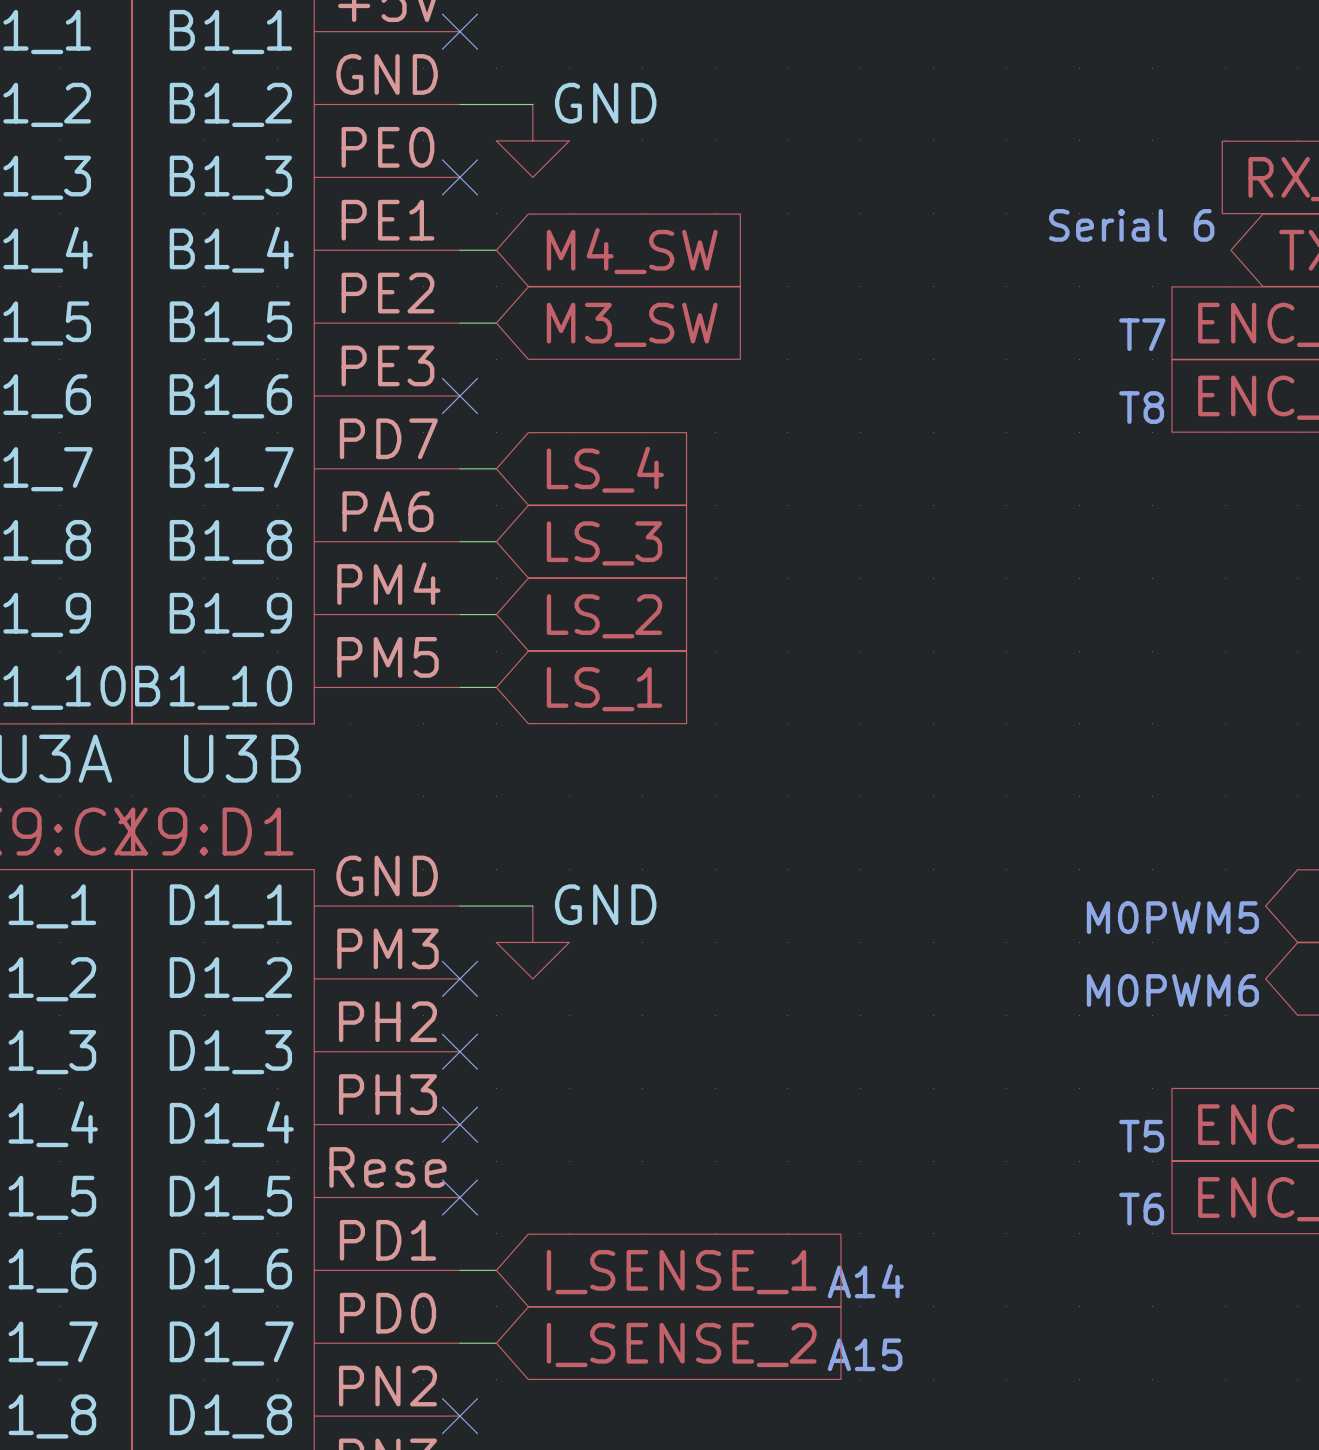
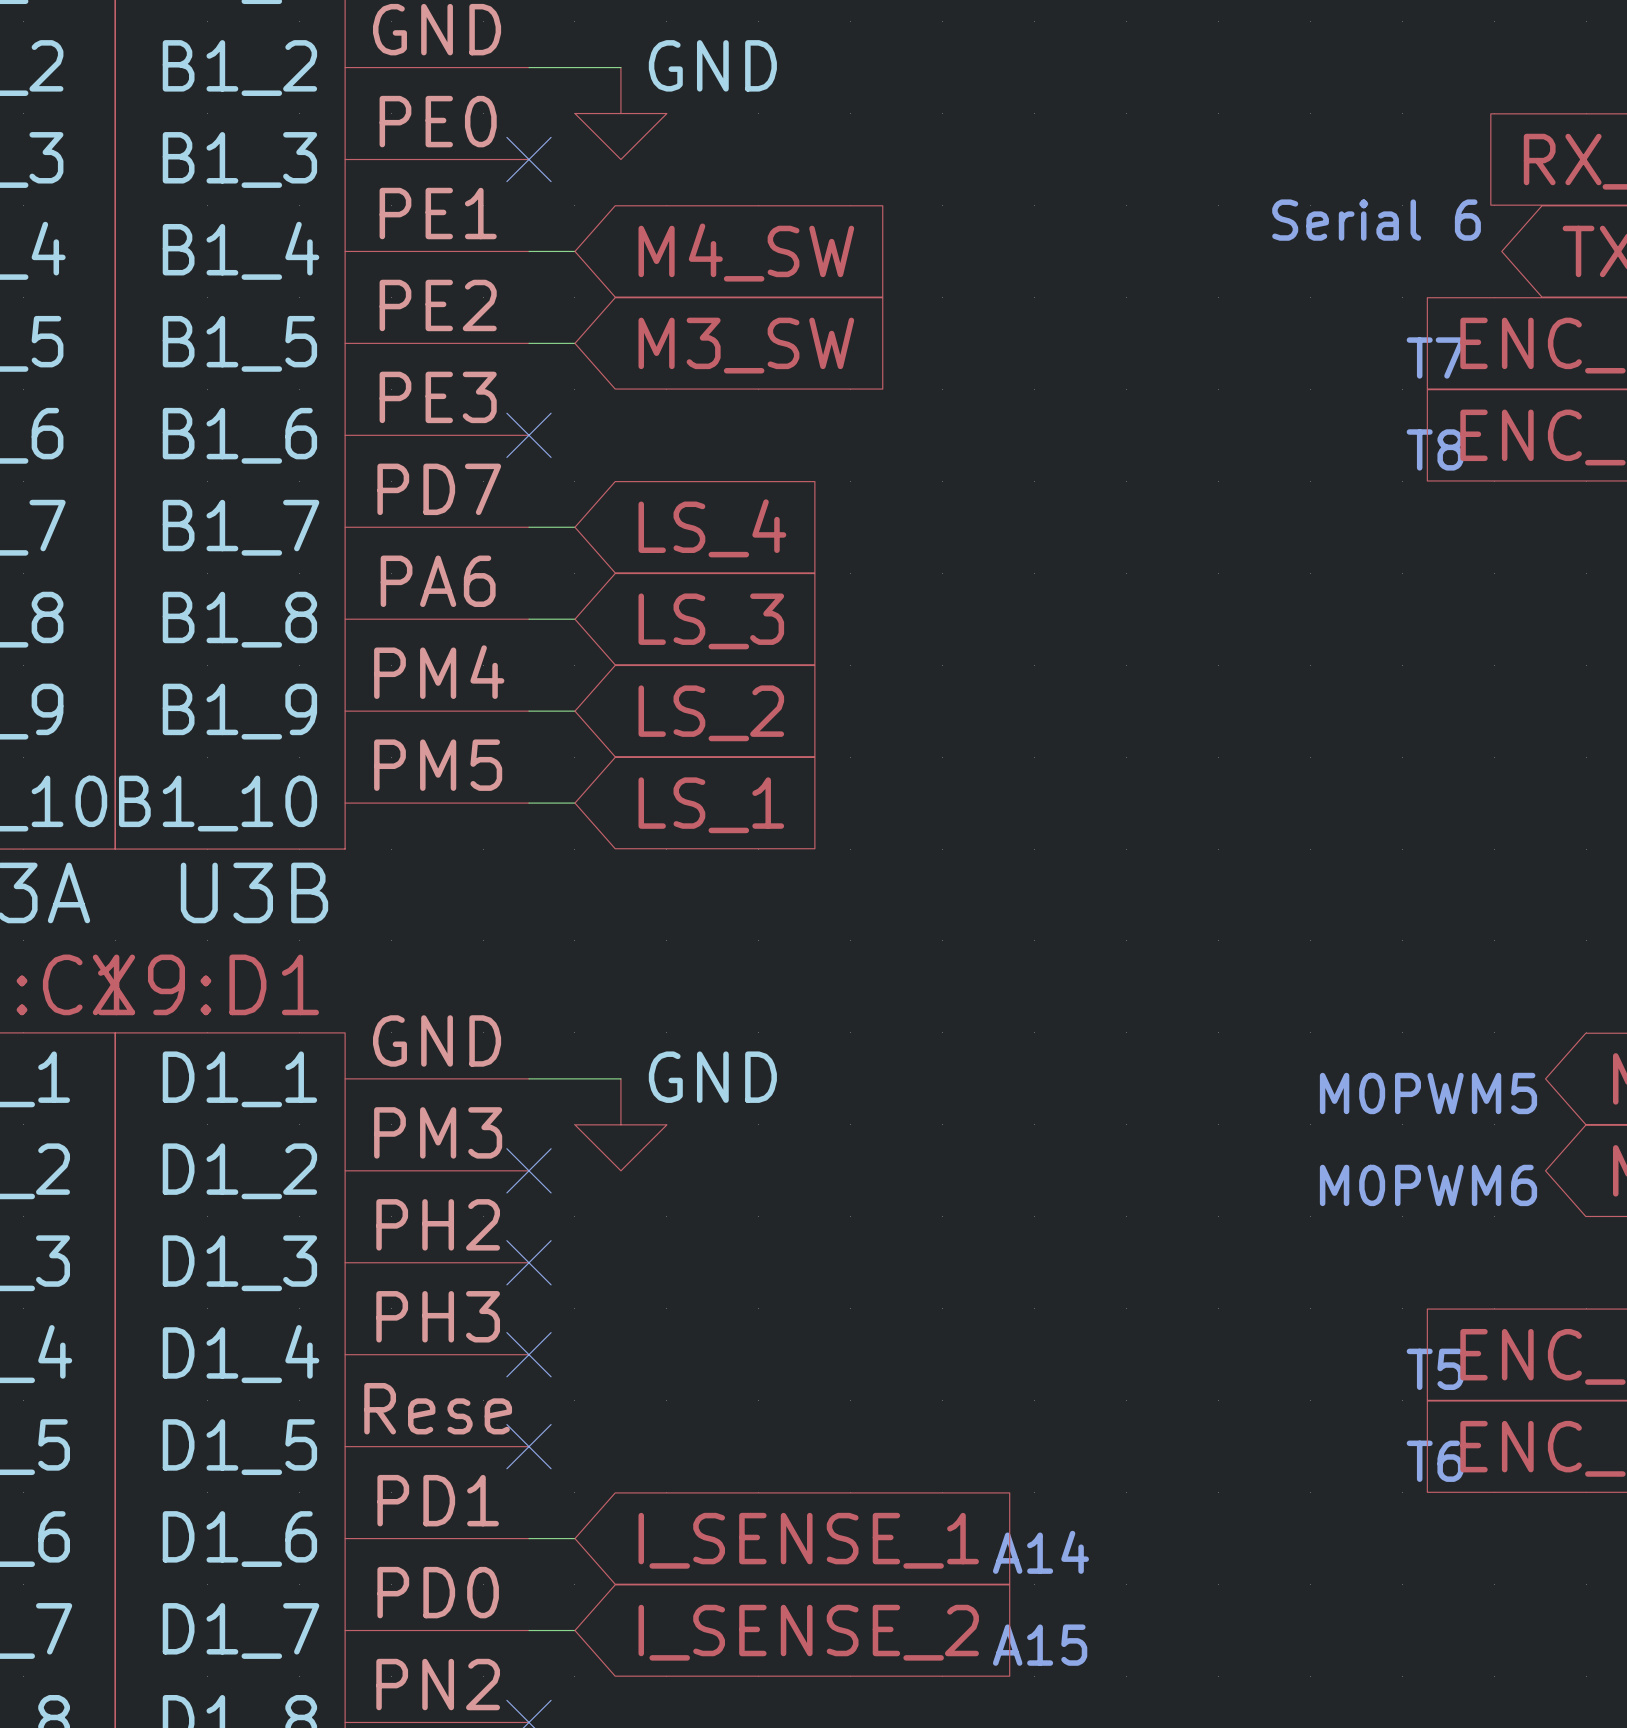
text position: T7 (1142, 334) -> T7 (1435, 357)
text position: T8 (1141, 407) -> T8 (1435, 449)
text position: T5 (1141, 1136) -> T5 (1435, 1369)
text position: T6 (1141, 1209) -> T6 (1435, 1461)

